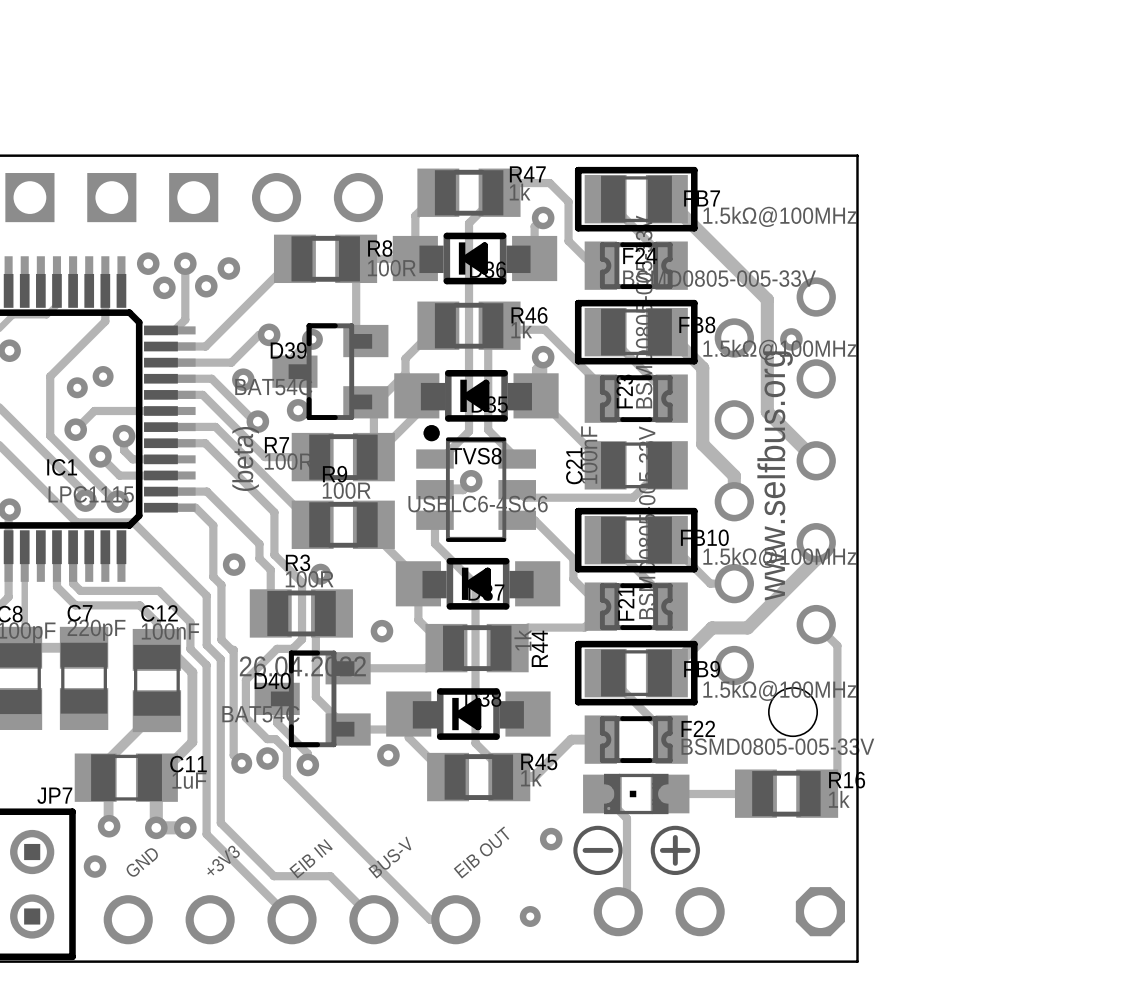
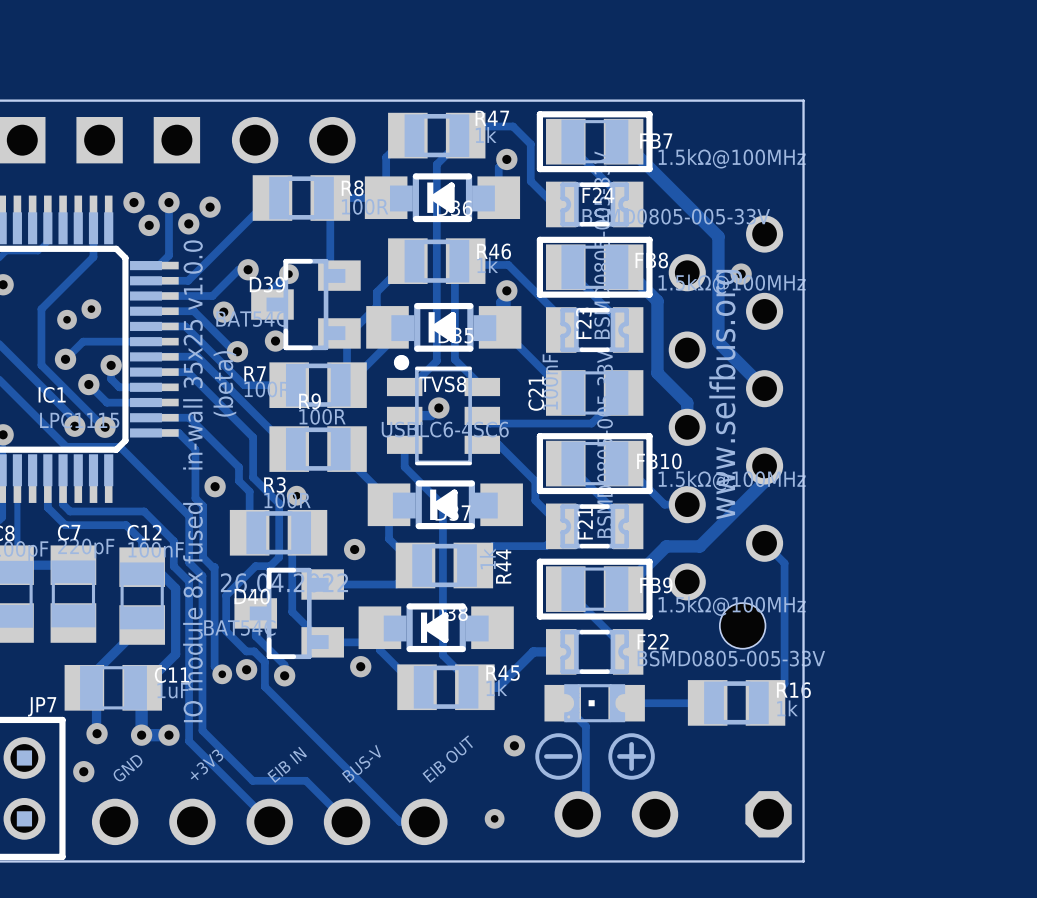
text: none -> IO module 8x fused in-wall 35x25 v1.0.0 (192, 481)

